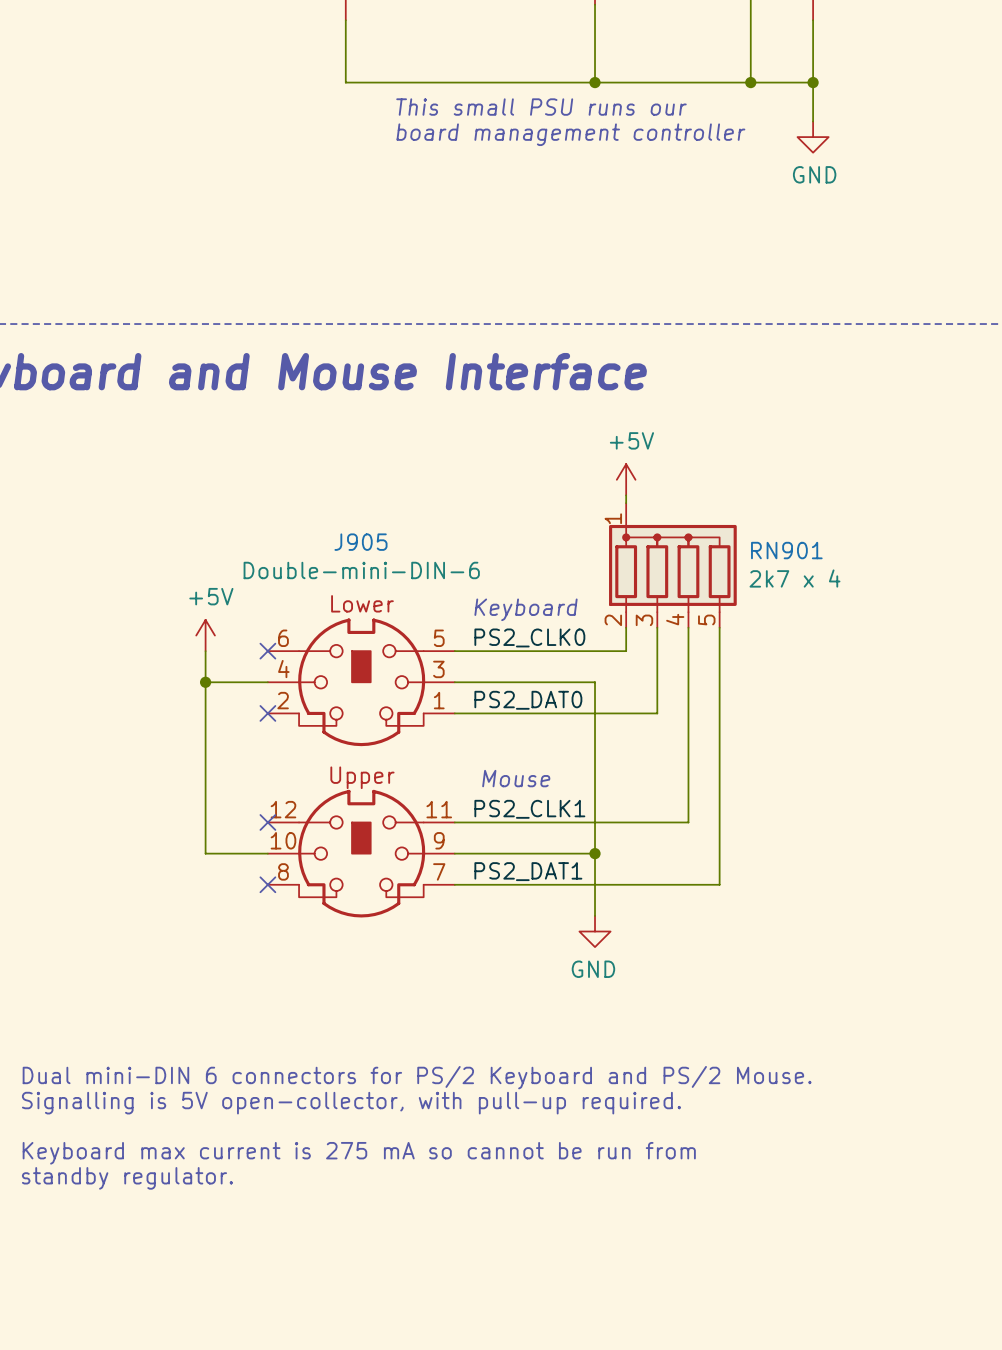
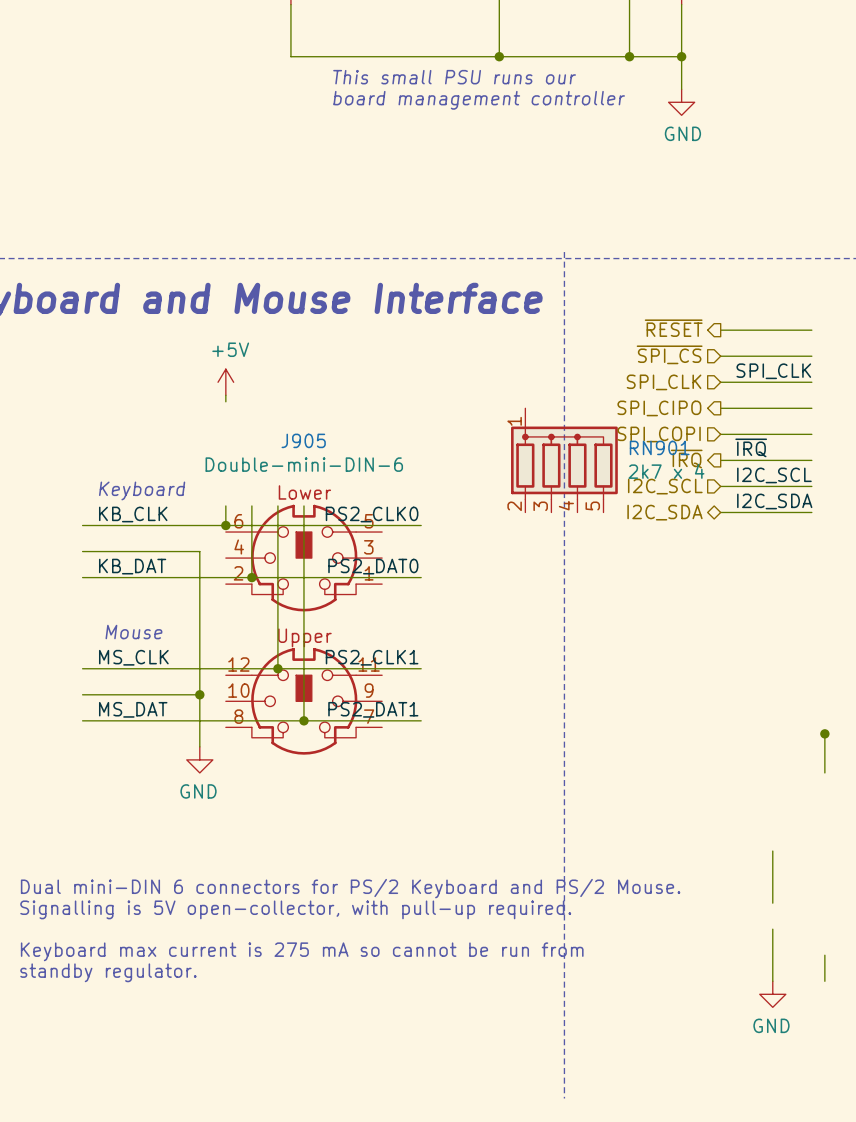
line: none -> (564, 252) (564, 1098)
hierarchical label: none -> ~{RESET} (673, 328)
wire: none -> (720, 330) (811, 330)
hierarchical label: none -> ~{SPI_CS} (669, 354)
wire: none -> (720, 356) (811, 356)
label: none -> SPI_CLK (773, 371)
wire: none -> (720, 382) (811, 382)
hierarchical label: none -> SPI_CLK (664, 382)
power symbol: +5V (626, 479) -> none
wire: none -> (225, 395) (225, 401)
wire: (626, 495) (626, 503) -> none
hierarchical label: none -> SPI_CIPO (659, 408)
wire: none -> (720, 408) (811, 408)
hierarchical label: none -> SPI_COPI (659, 434)
wire: none -> (720, 434) (811, 434)
label: none -> ~{IRQ} (751, 447)
hierarchical label: none -> ~{IRQ} (686, 459)
wire: none -> (720, 460) (811, 460)
label: none -> I2C_SCL (774, 475)
hierarchical label: none -> I2C_SCL (665, 486)
wire: none -> (720, 486) (811, 486)
text: none -> Keyboard (142, 490)
text: Keyboard (526, 609) -> none
label: none -> I2C_SDA (774, 501)
wire: none -> (225, 505) (225, 525)
wire: none -> (251, 505) (251, 577)
wire: none -> (277, 505) (277, 668)
wire: none -> (303, 505) (303, 720)
wire: (626, 627) (626, 651) (454, 651) -> none
wire: (657, 627) (657, 713) (454, 713) -> none
wire: (688, 627) (688, 822) (454, 822) -> none
wire: (719, 627) (719, 884) (454, 884) -> none
hierarchical label: none -> I2C_SDA (664, 512)
wire: none -> (720, 512) (811, 512)
label: none -> KB_CLK (133, 514)
power symbol position: +5V (205, 635) -> +5V (225, 382)
label position: PS2_CLK0 (529, 637) -> PS2_CLK0 (372, 514)
wire: none -> (82, 525) (421, 525)
junction: none -> (225, 525)
wire: (205, 651) (205, 853) (267, 853) -> none
no-connect mark: (267, 651) -> none
wire: none -> (82, 551) (199, 551) (199, 746)
wire: (205, 682) (267, 682) -> none
junction: (205, 682) -> none
wire: (454, 682) (595, 682) (595, 915) -> none
label: none -> KB_DAT (132, 566)
label position: PS2_DAT0 (528, 700) -> PS2_DAT0 (373, 566)
wire: none -> (82, 577) (421, 577)
junction: none -> (251, 577)
no-connect mark: (267, 713) -> none
text: none -> Mouse (133, 632)
text: Mouse (516, 778) -> none
label: none -> MS_CLK (133, 657)
label position: PS2_CLK1 (529, 809) -> PS2_CLK1 (372, 657)
wire: none -> (82, 668) (421, 668)
junction: none -> (277, 668)
no-connect mark: (267, 822) -> none
wire: none -> (82, 694) (199, 694)
junction: none -> (199, 694)
wire: (454, 853) (595, 853) -> none
junction: (595, 853) -> none
label: none -> MS_DAT (133, 709)
label position: PS2_DAT1 (528, 871) -> PS2_DAT1 (373, 709)
wire: none -> (82, 720) (421, 720)
junction: none -> (303, 720)
no-connect mark: (267, 884) -> none
wire: none -> (824, 733) (824, 772)
junction: none -> (824, 733)
power symbol: none -> GND (199, 759)
power symbol: GND (595, 931) -> none
wire: none -> (772, 851) (772, 903)
wire: none -> (772, 929) (772, 981)
wire: none -> (824, 955) (824, 981)
power symbol: none -> GND (772, 994)

